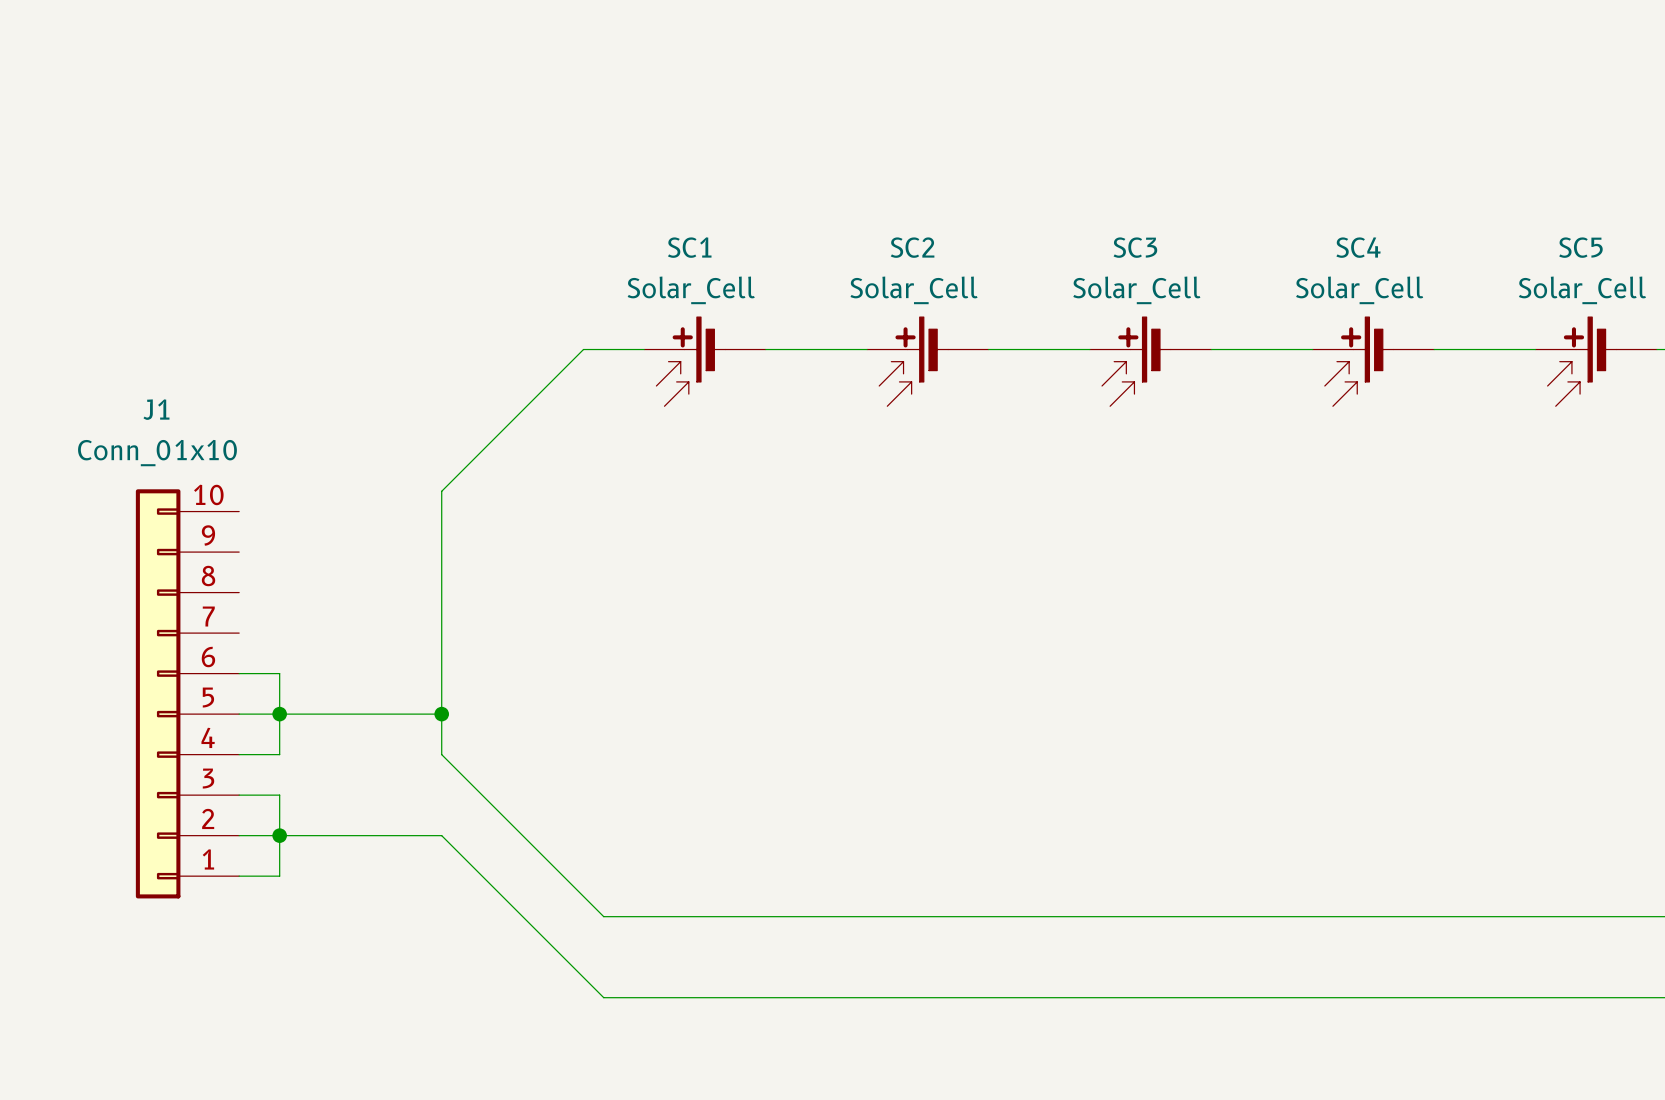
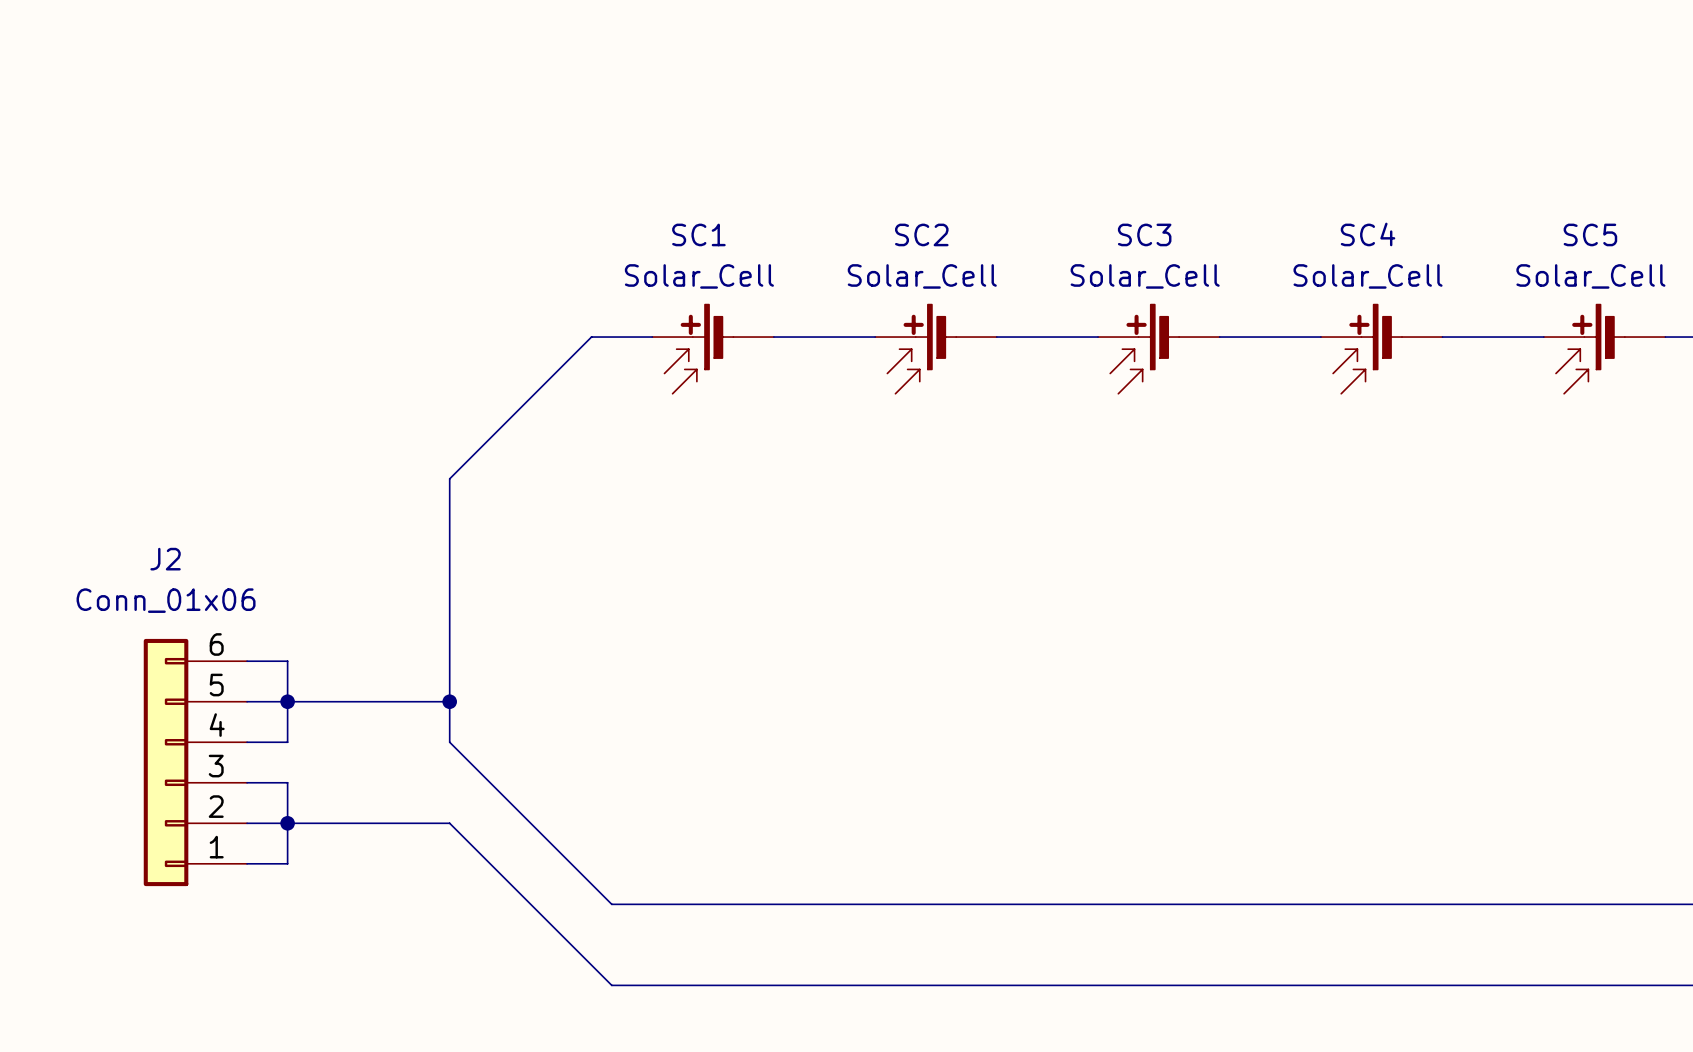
J1: Conn_01x10 (187, 693) -> none
J2: none -> Conn_01x06 (195, 762)

